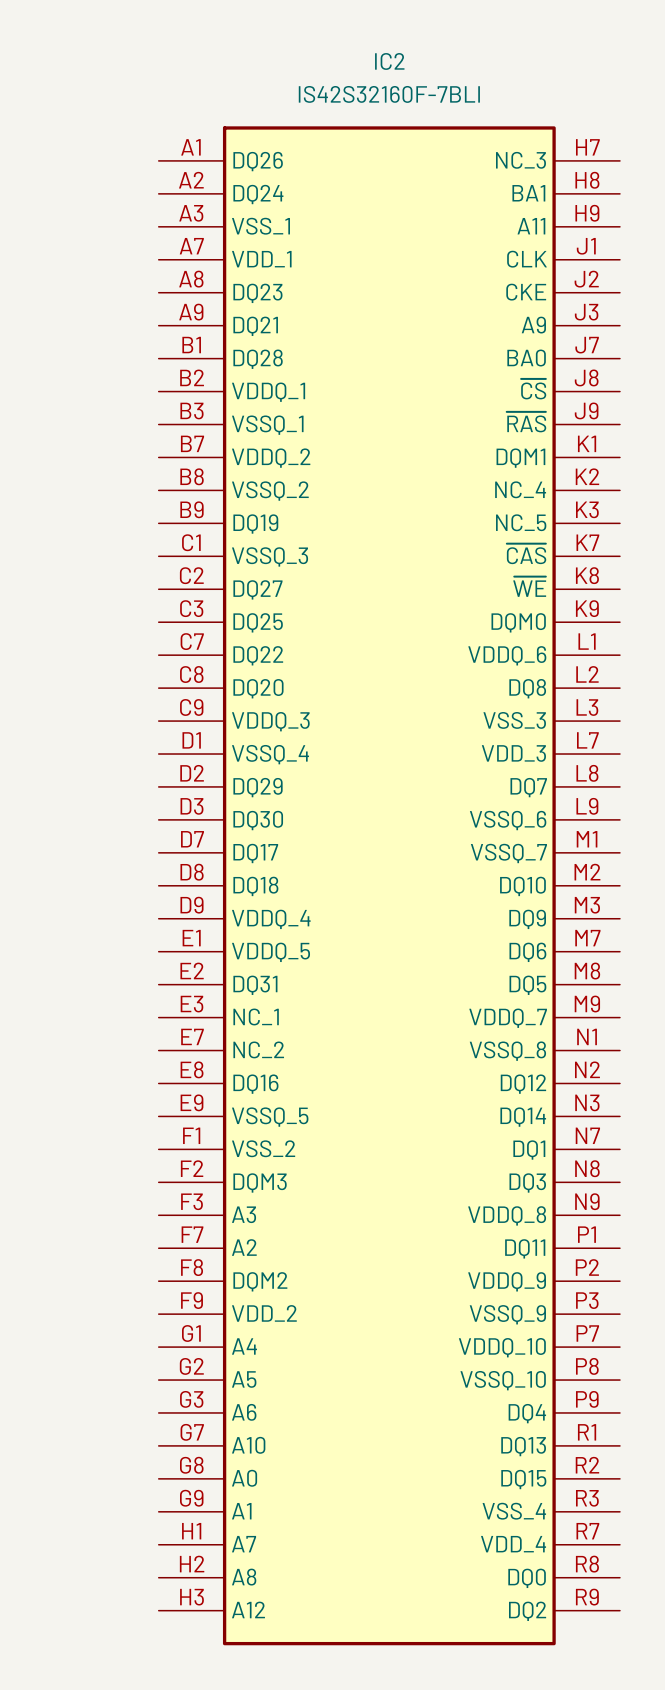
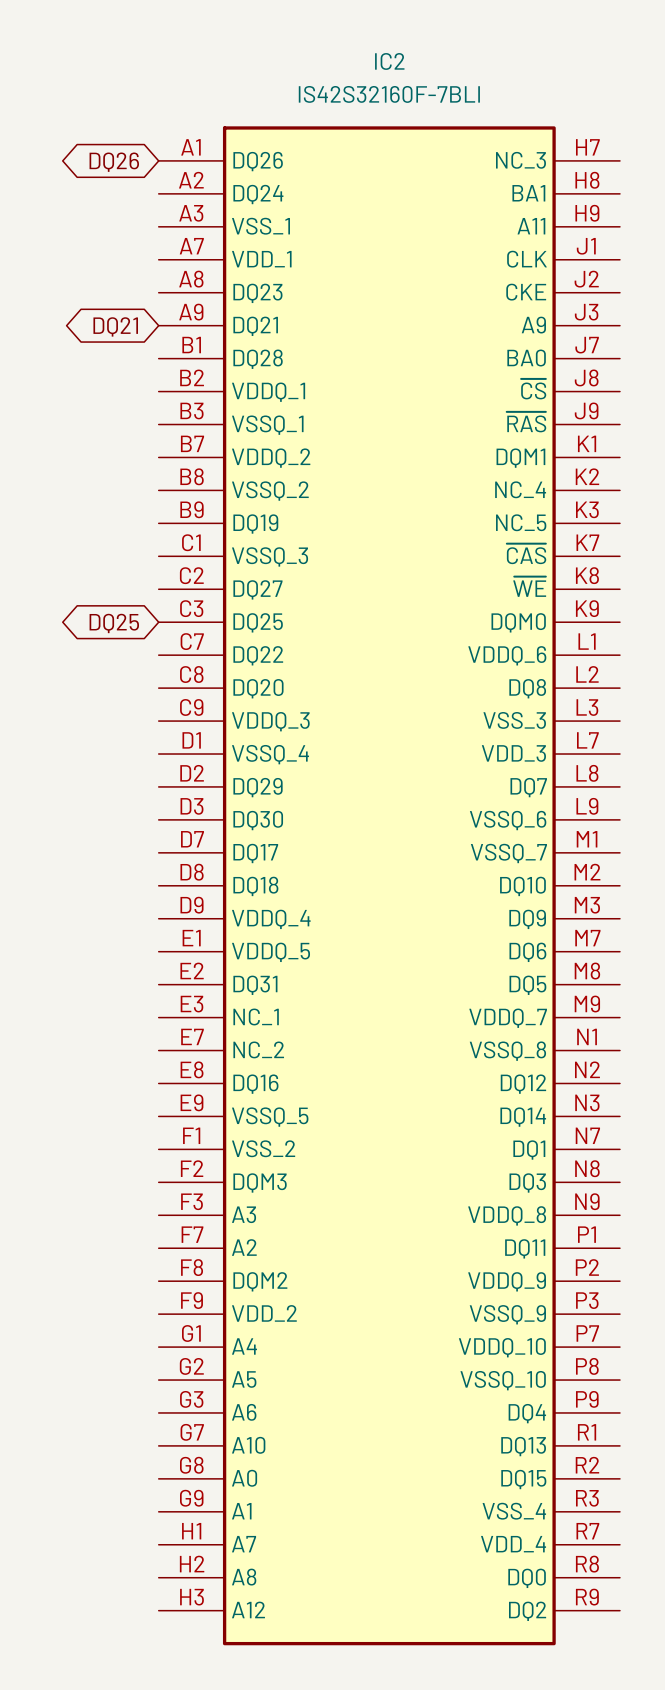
global label: none -> DQ26 (114, 162)
global label: none -> DQ21 (115, 326)
global label: none -> DQ25 (114, 623)

